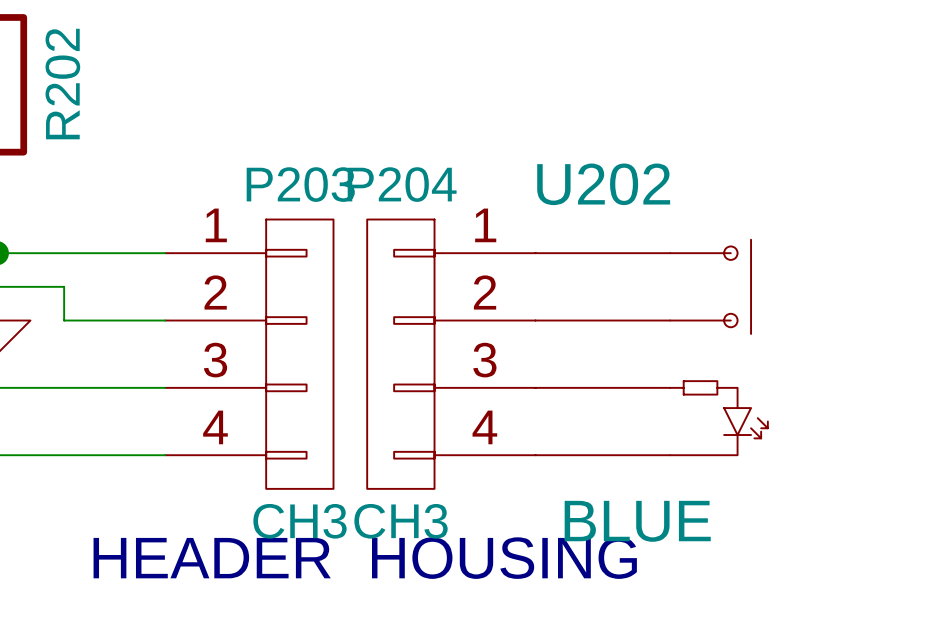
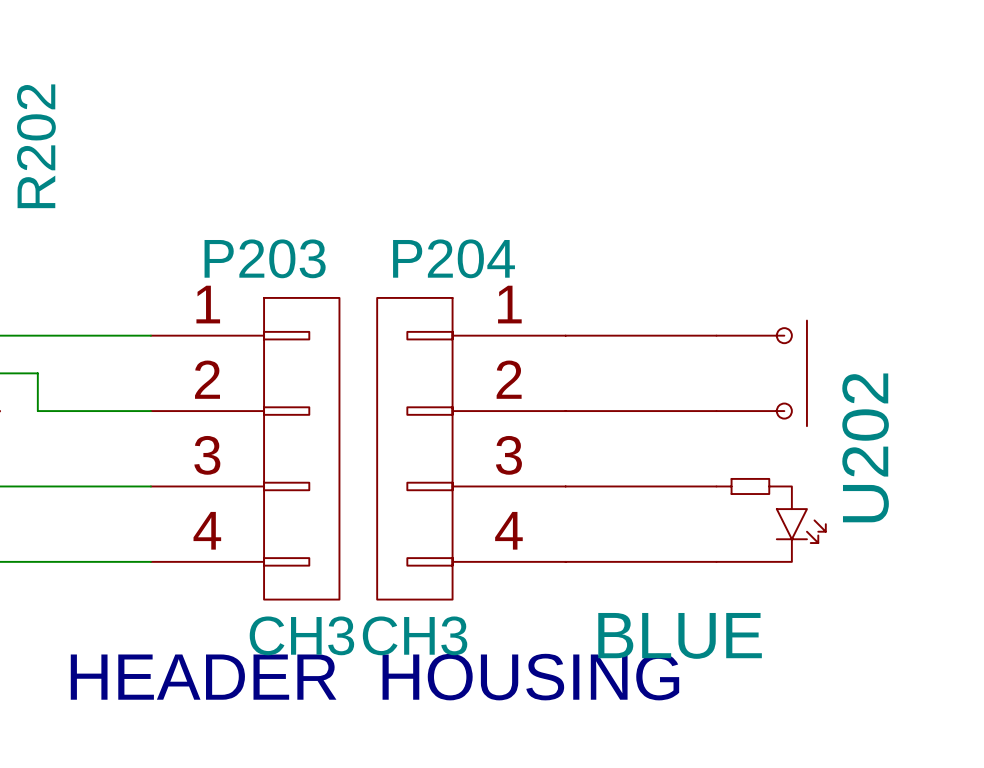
P203 name position: P203 (300, 184) -> P203 (265, 258)
P204 name position: P204 (402, 184) -> P204 (454, 258)
U202 name rotation: 0° (603, 184) -> 90° counterclockwise (865, 447)
U202 name position: U202 (603, 184) -> U202 (865, 447)

